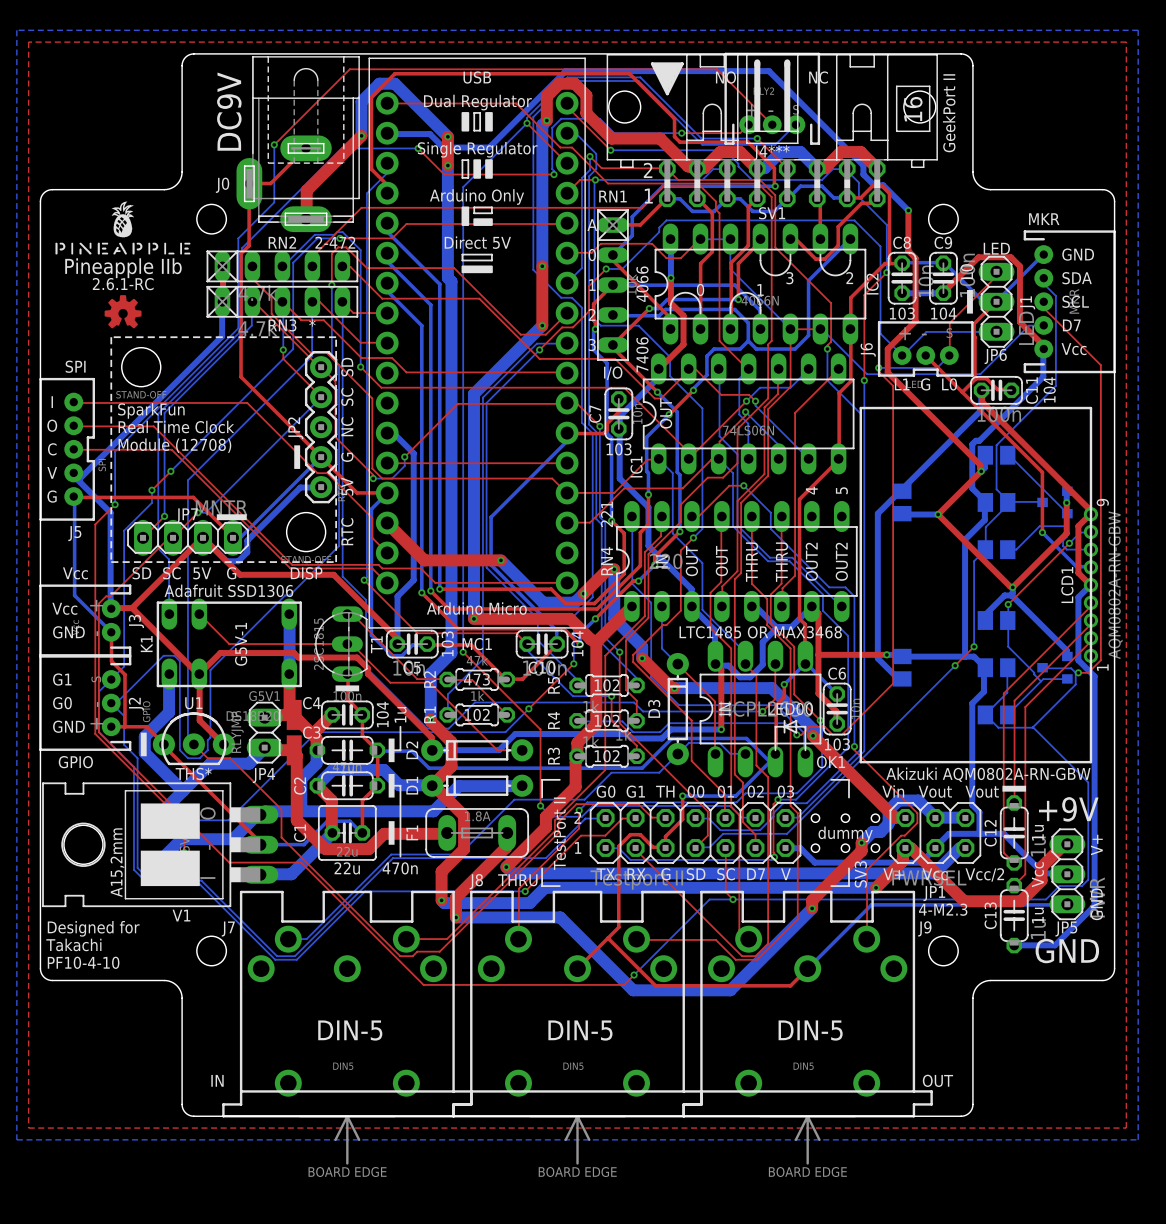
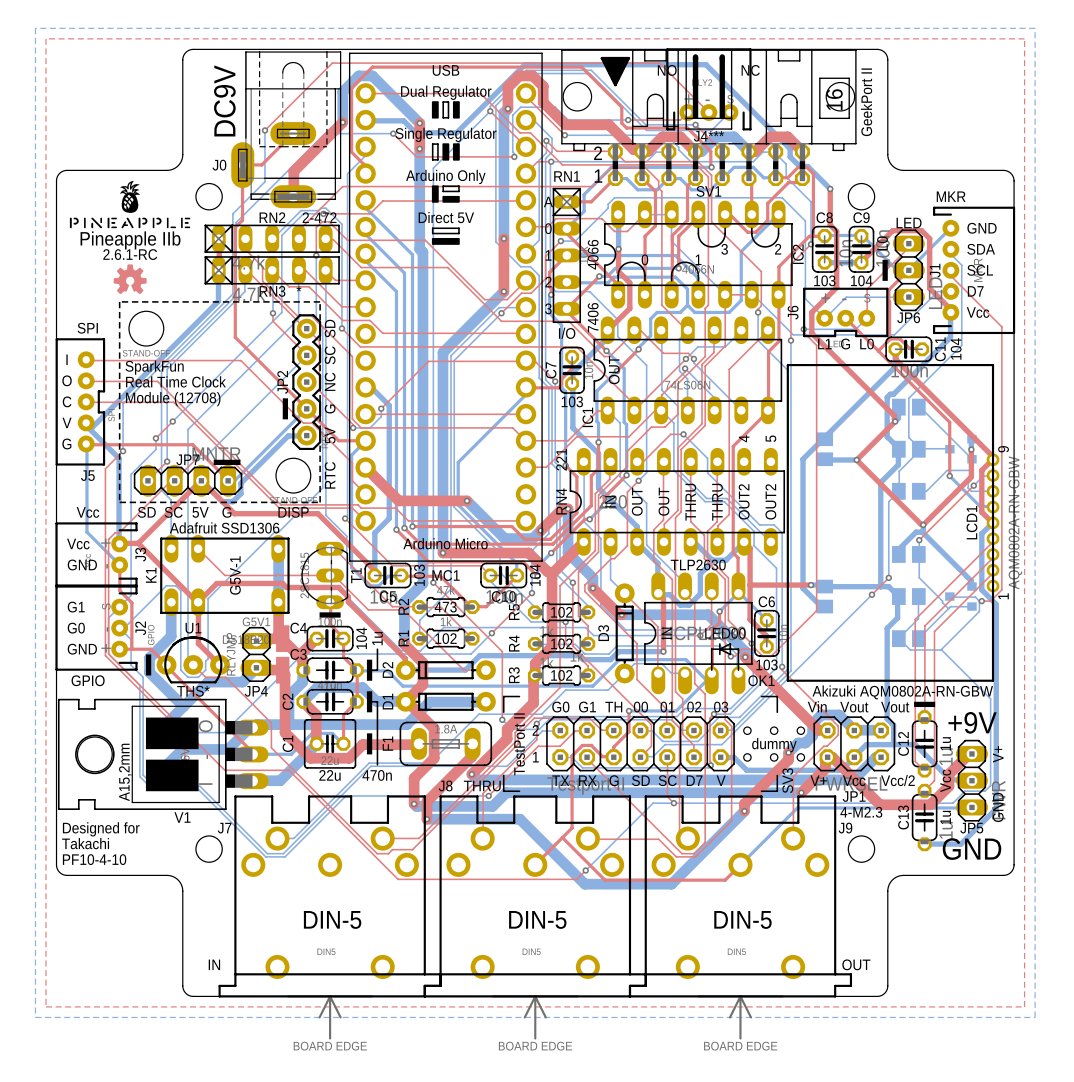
text: LTC1485 OR MAX3468 (760, 632) -> TLP2630 (698, 564)

